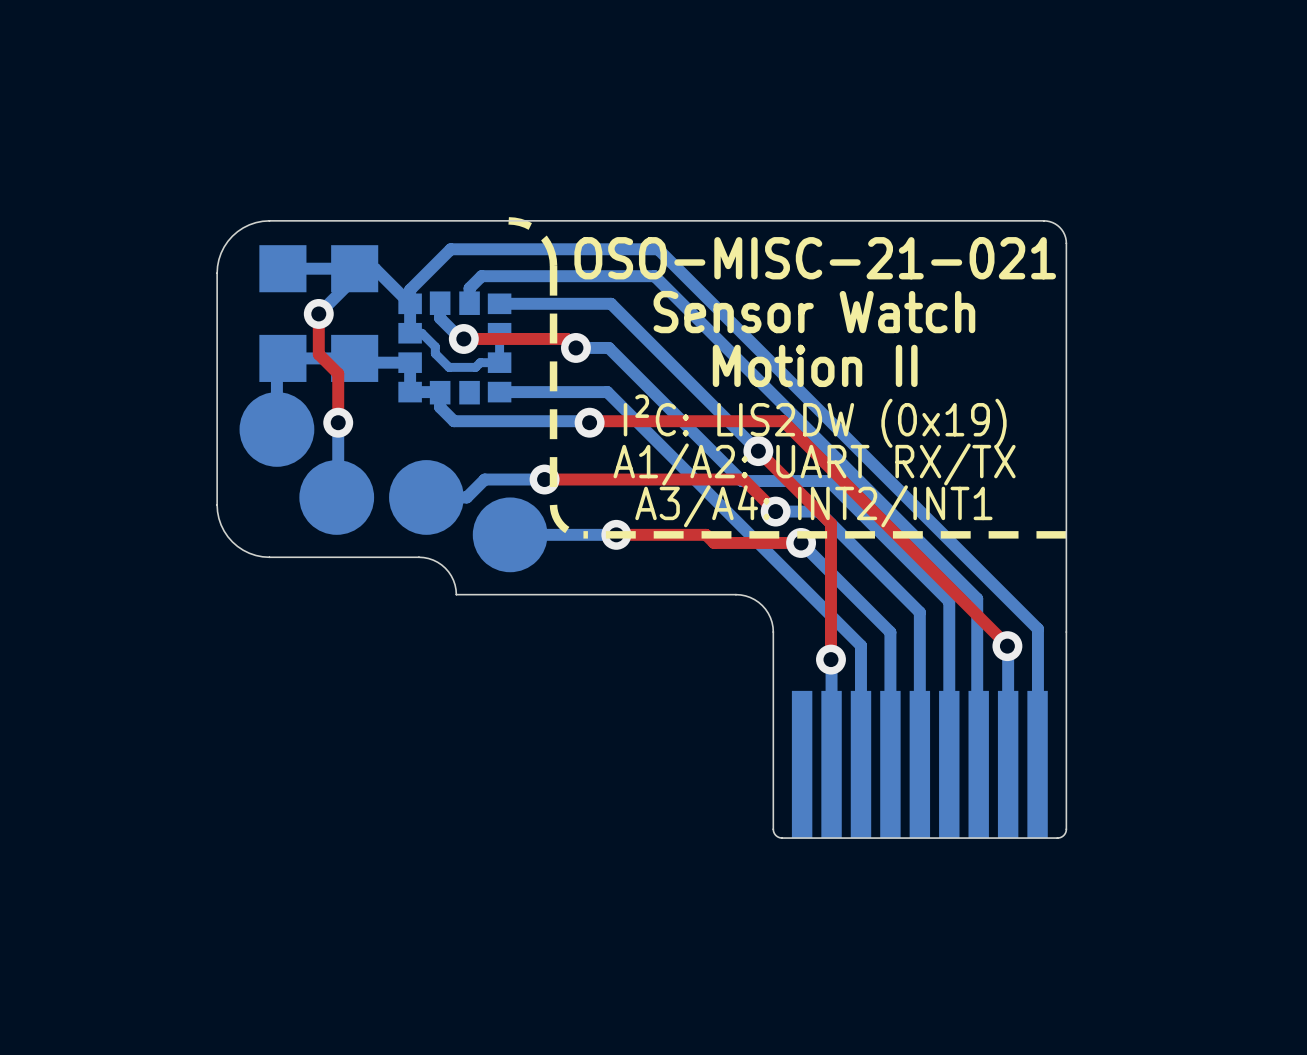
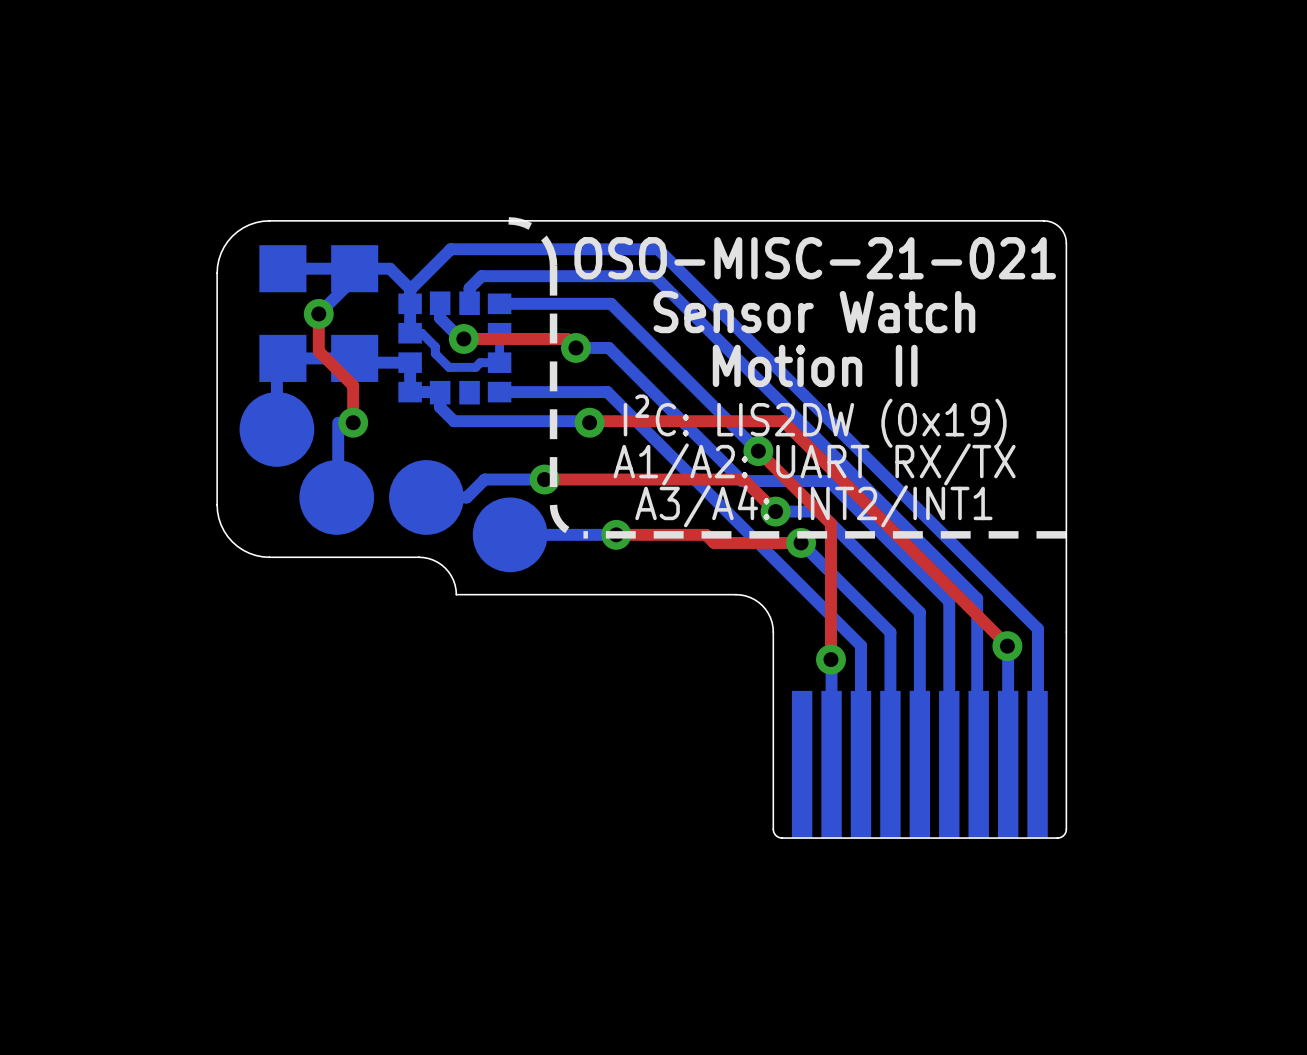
bottom track: (375, 268) (410, 303) -> (375, 268) (389, 268) (410, 288)
top track: (318, 351) (318, 354) (338, 373) (338, 422) -> (318, 351) (353, 385) (353, 422)
via position: (338, 422) -> (353, 422)

